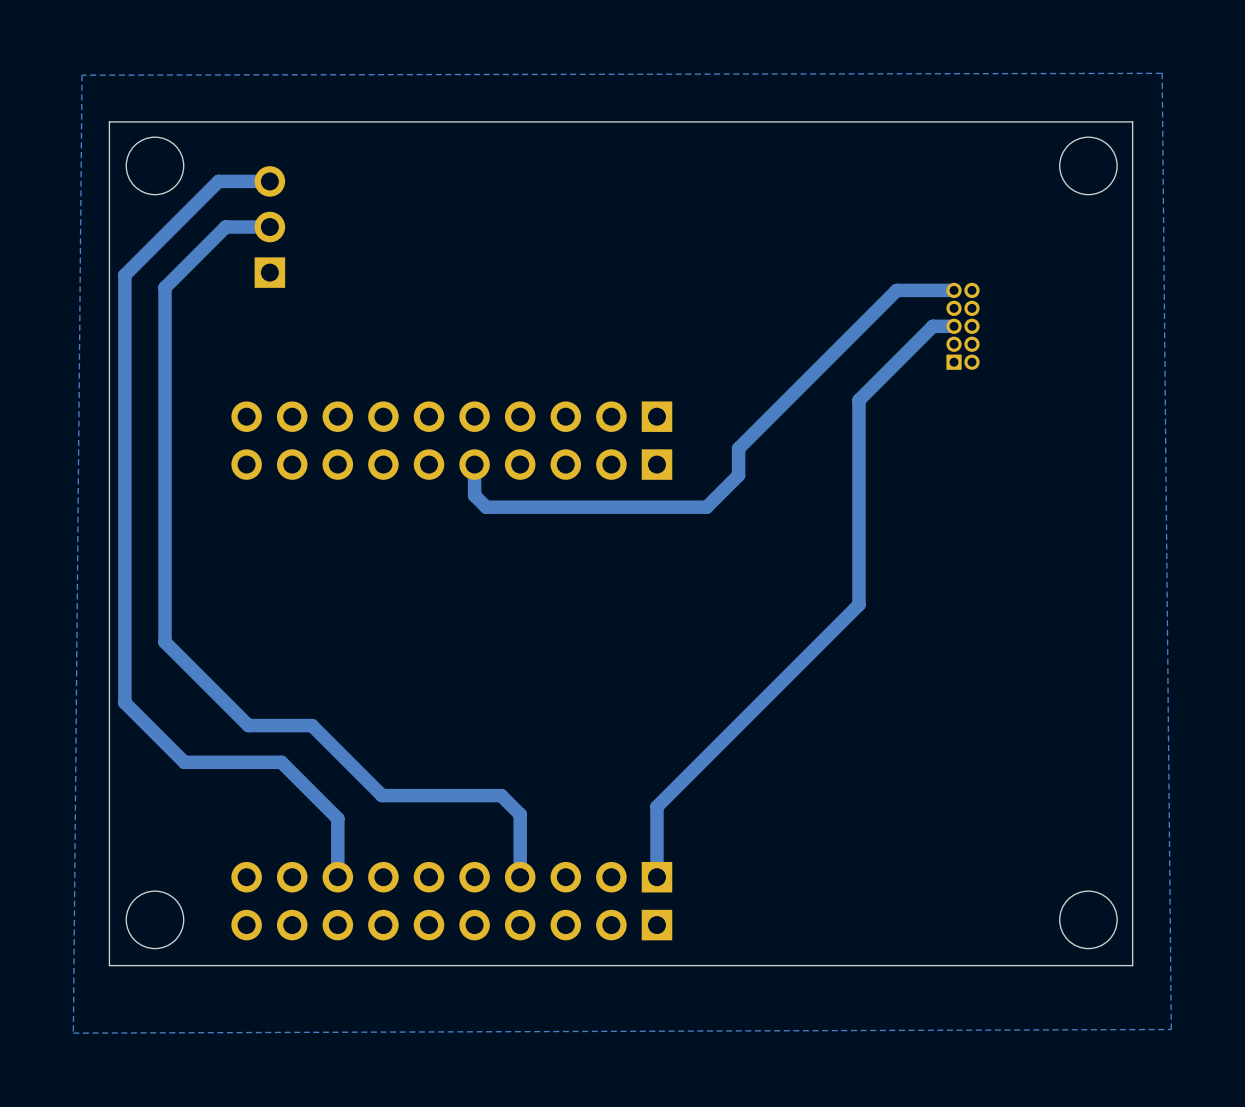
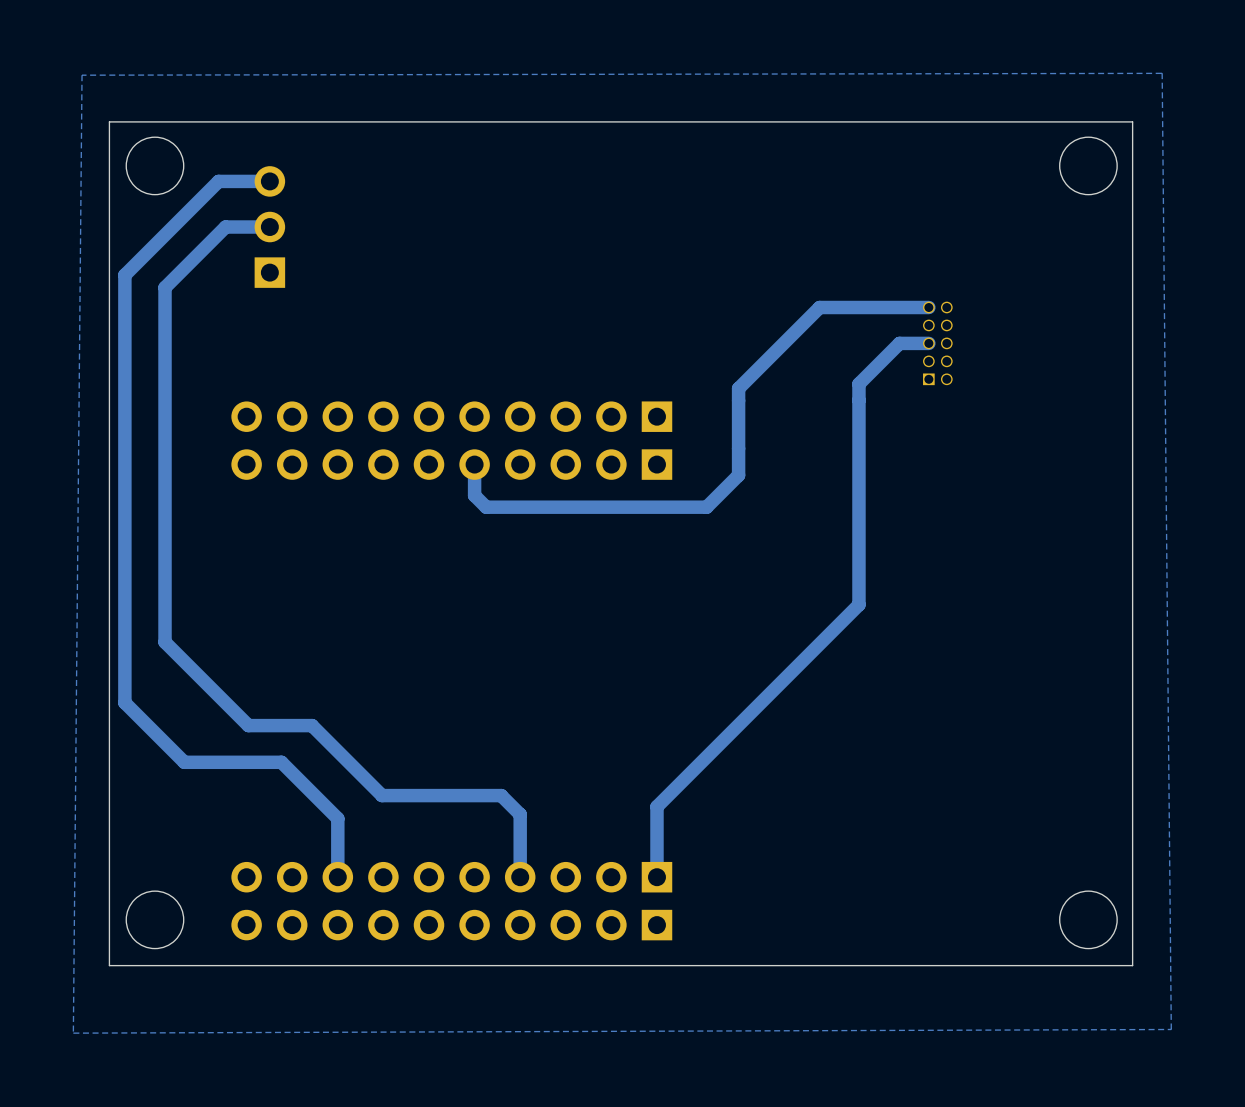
track: (954, 290) (896, 290) (738, 448) -> (928, 307) (819, 307) (738, 388) (738, 448)
track: (954, 326) (932, 326) (858, 400) -> (928, 343) (899, 343) (858, 384) (858, 400)
part: (963, 326) -> none
part: none -> (937, 343)

